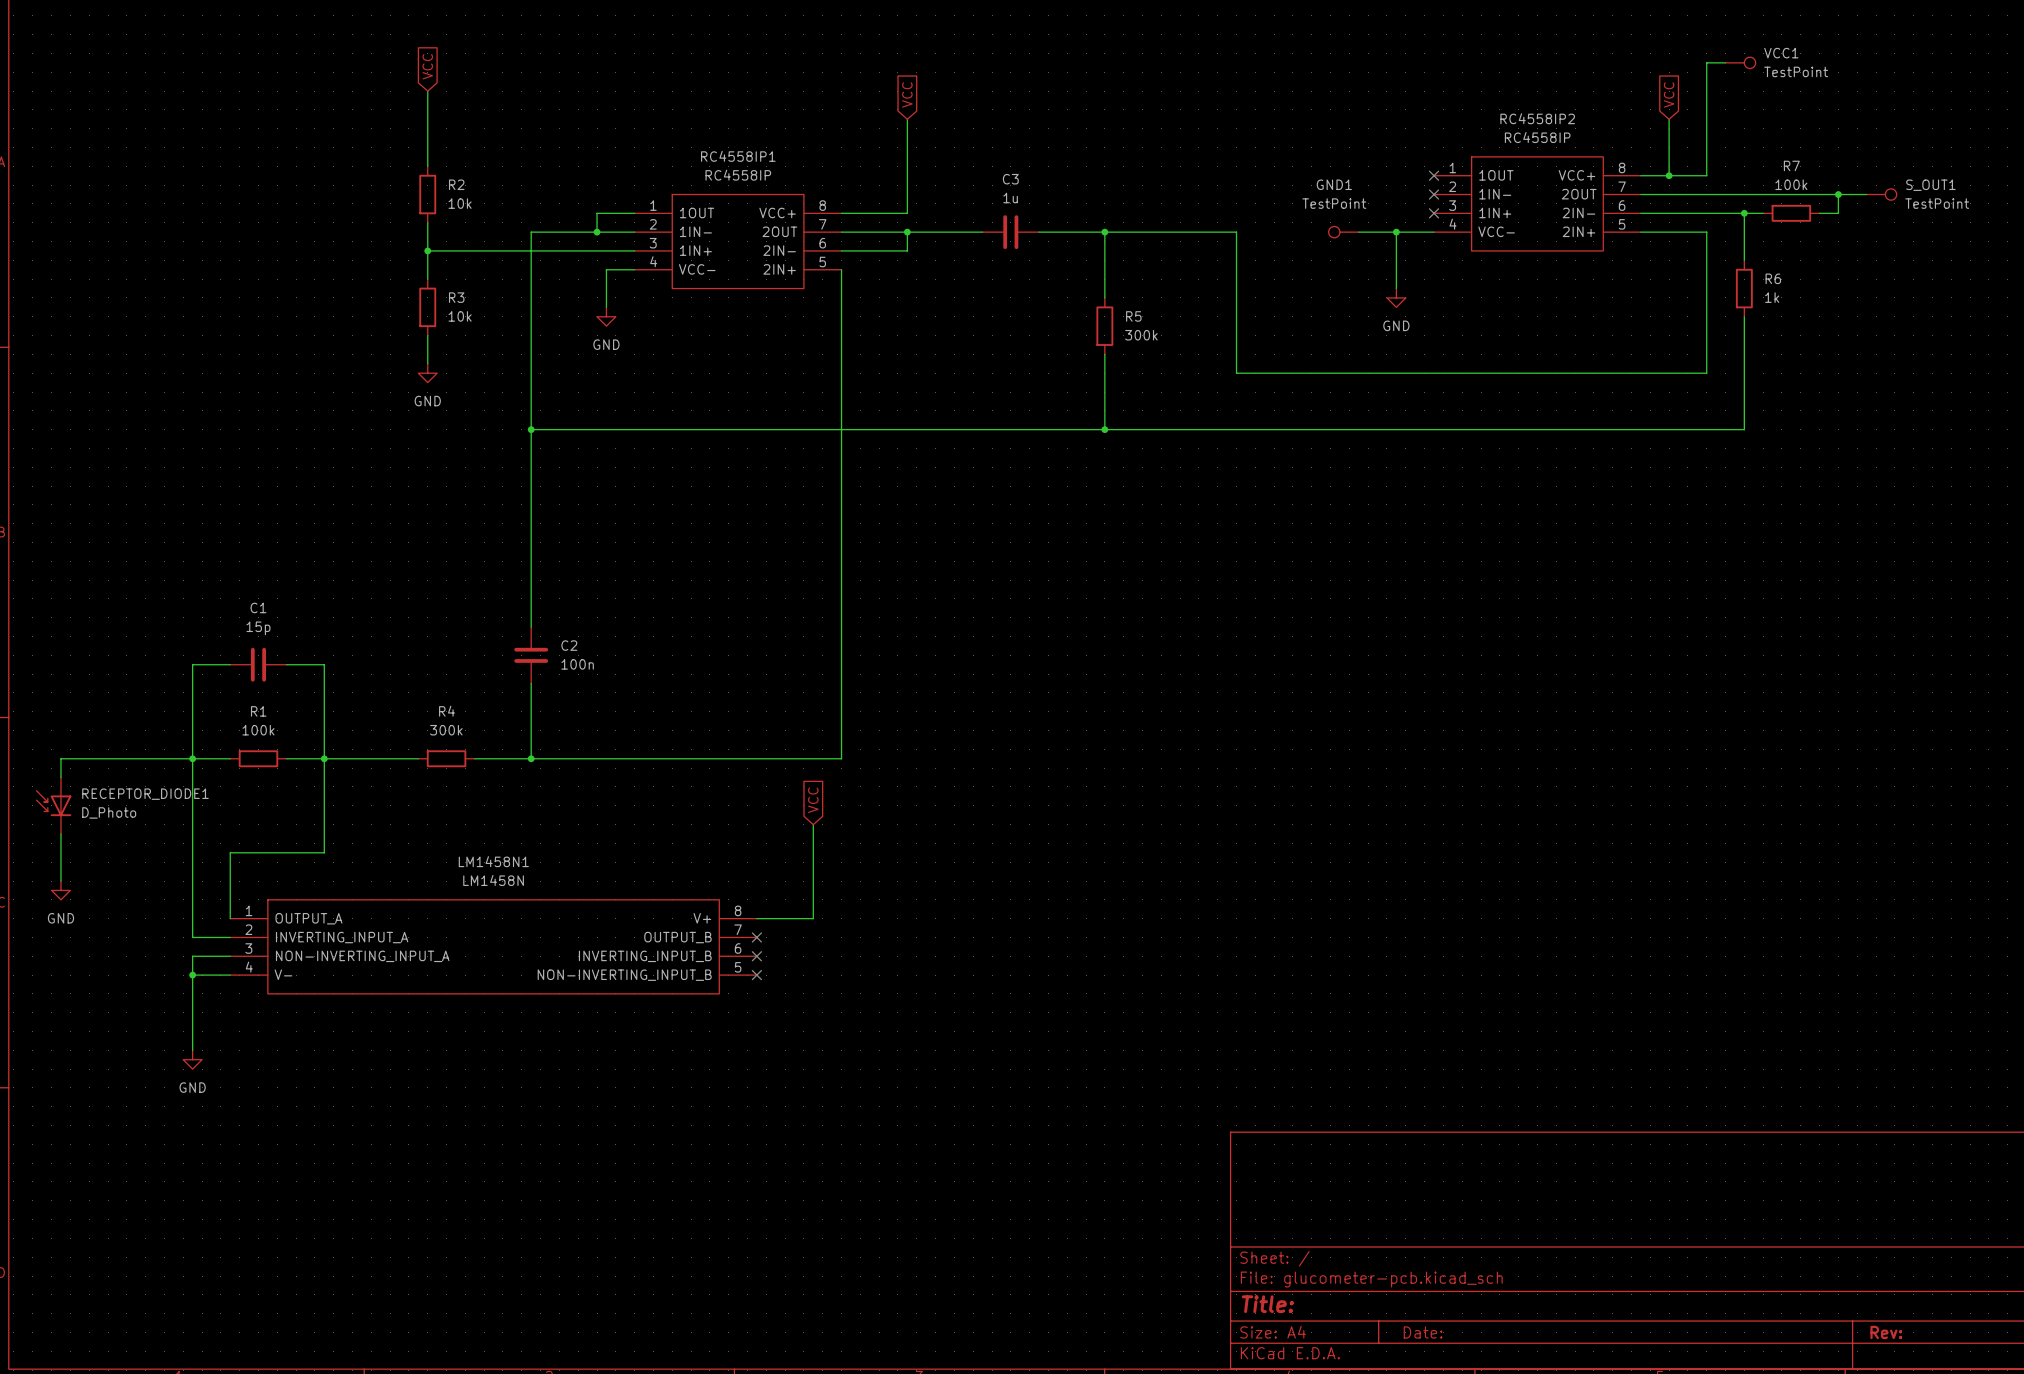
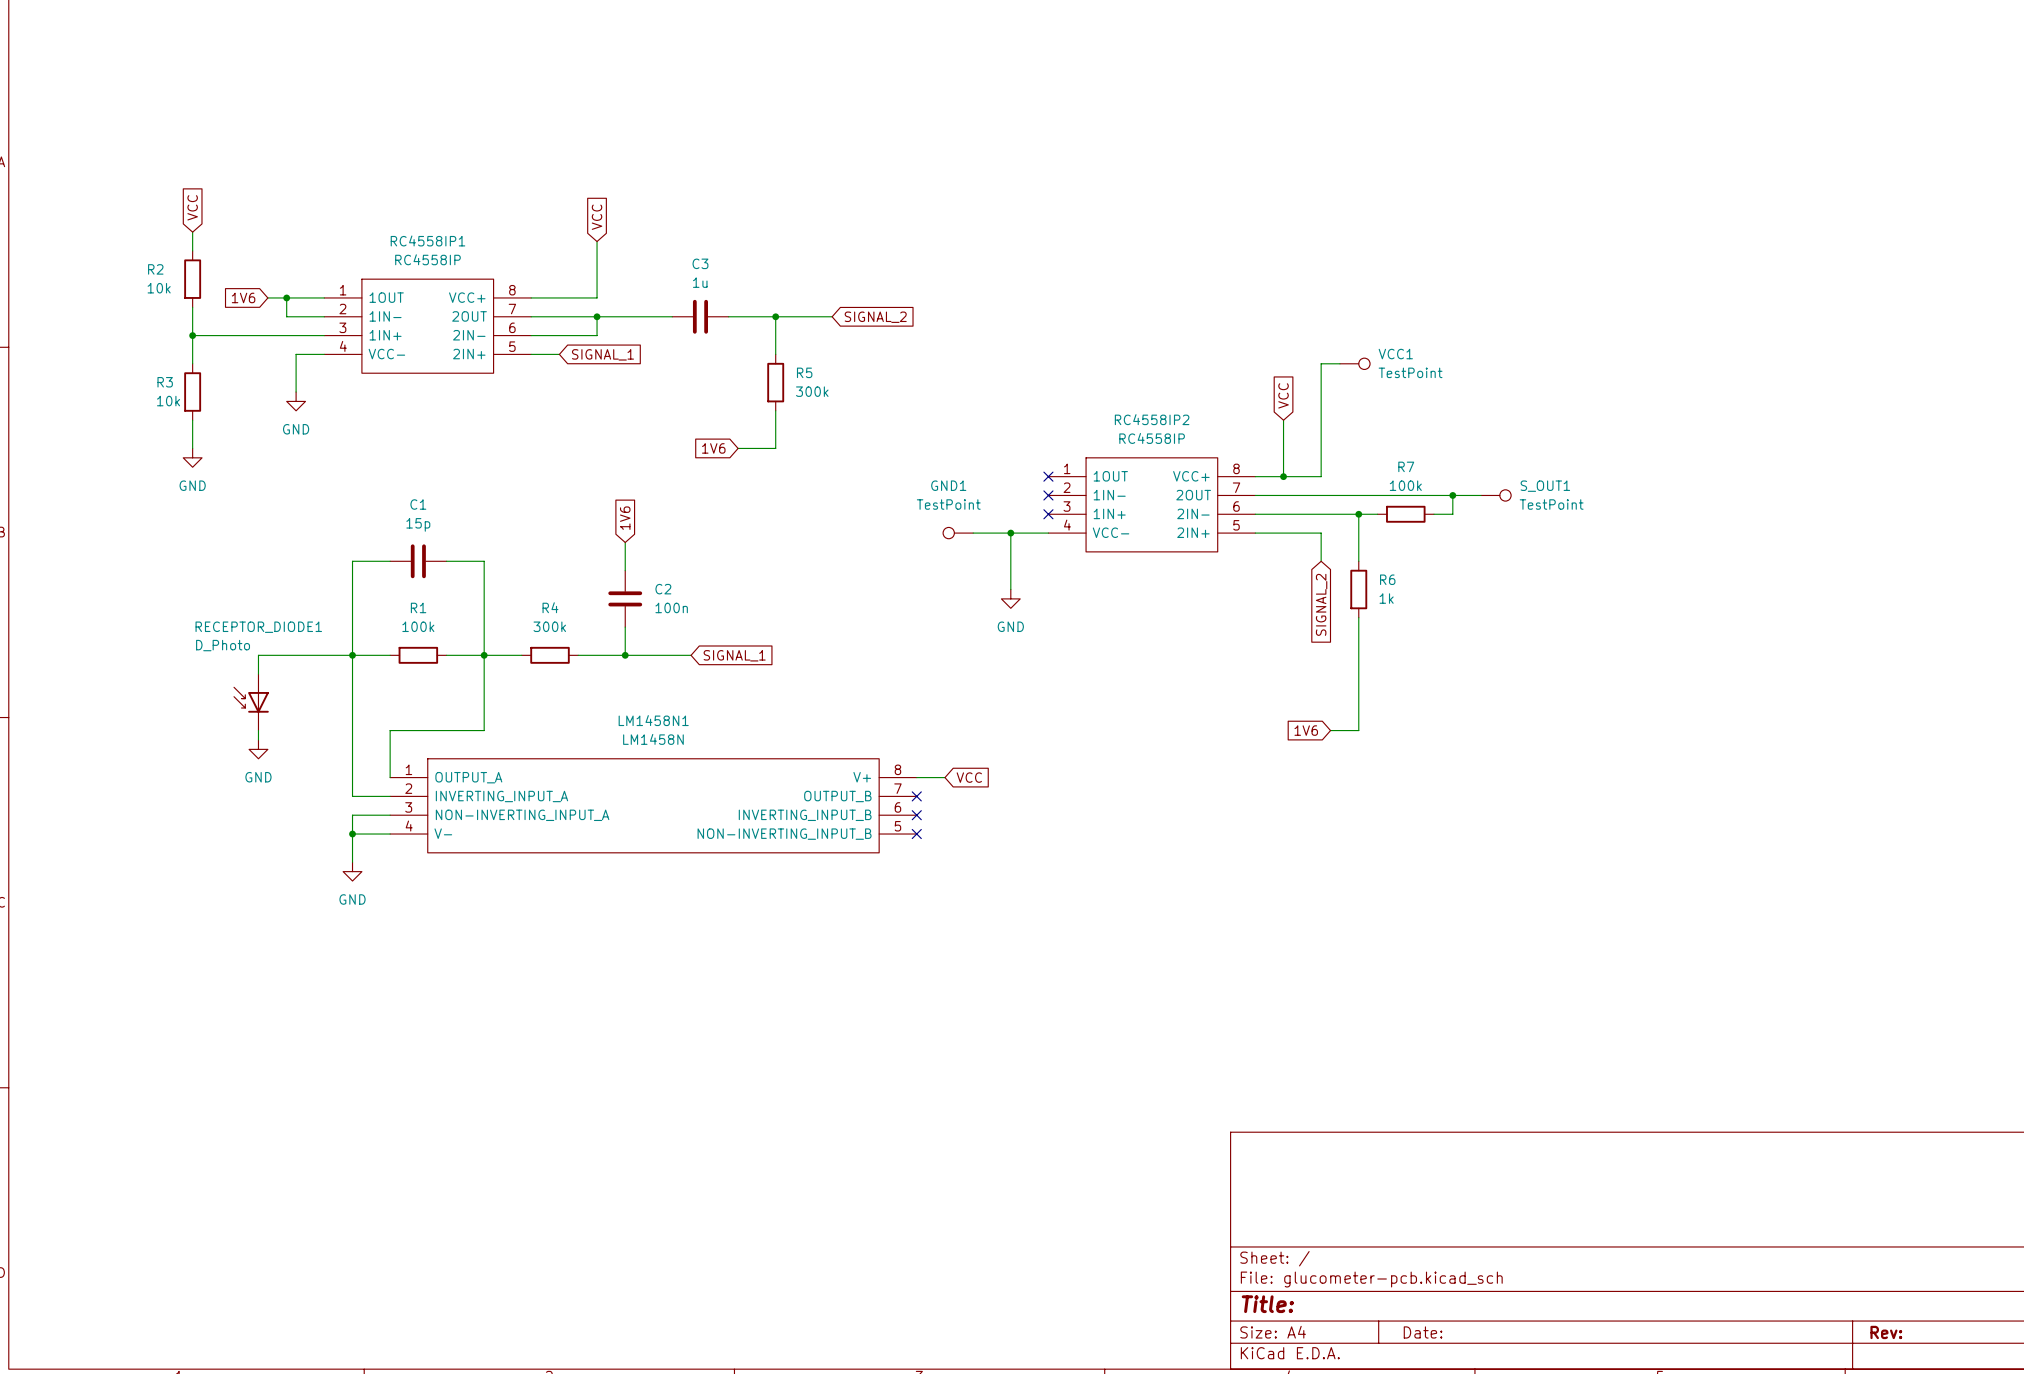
wire: (1725, 62) (1706, 62) (1706, 175) (1640, 175) -> none
VCC1 position: (1740, 62) -> (1355, 363)
global label: VCC (427, 66) -> none
wire: (427, 91) (427, 166) -> none
global label: VCC (907, 94) -> none
global label: VCC (1669, 94) -> none
wire: (907, 119) (907, 213) (841, 213) -> none
wire: (1669, 119) (1669, 175) -> none
no-connect mark: (1434, 175) -> none
junction: (1669, 175) -> none
R2 name position: R2 (456, 184) -> R2 (155, 269)
R2 position: (427, 194) -> (192, 279)
no-connect mark: (1434, 194) -> none
wire: (1640, 194) (1866, 194) -> none
wire: (1838, 194) (1838, 213) (1819, 213) -> none
junction: (1838, 194) -> none
S_OUT1 position: (1881, 194) -> (1496, 495)
R2 value position: 10k (460, 203) -> 10k (159, 288)
RC4558IP2 position: (1537, 203) -> (1151, 504)
global label: none -> VCC (192, 207)
wire: (634, 213) (597, 213) (597, 232) -> none
no-connect mark: (1434, 213) -> none
wire: (1640, 213) (1763, 213) -> none
wire: (1744, 213) (1744, 260) -> none
junction: (1744, 213) -> none
R7 position: (1791, 213) -> (1405, 514)
global label: none -> VCC (597, 217)
wire: (427, 222) (427, 279) -> none
wire: none -> (192, 232) (192, 250)
junction: (597, 232) -> none
wire: (634, 232) (531, 232) (531, 627) -> none
wire: (841, 232) (982, 232) -> none
wire: (907, 232) (907, 250) (841, 250) -> none
junction: (907, 232) -> none
C3 position: (1010, 232) -> (700, 316)
wire: (1039, 232) (1236, 232) (1236, 373) (1706, 373) (1706, 232) (1640, 232) -> none
wire: (1104, 232) (1104, 297) -> none
junction: (1104, 232) -> none
GND1 position: (1343, 232) -> (958, 533)
wire: (1358, 232) (1434, 232) -> none
wire: (1396, 232) (1396, 288) -> none
junction: (1396, 232) -> none
wire: none -> (597, 241) (597, 297) (531, 297)
RC4558IP1 position: (738, 241) -> (427, 326)
wire: (427, 250) (634, 250) -> none
junction: (427, 250) -> none
wire: (634, 269) (606, 269) (606, 307) -> none
wire: (841, 269) (841, 758) (474, 758) -> none
R6 position: (1744, 288) -> (1358, 589)
global label: none -> 1V6 (243, 297)
wire: none -> (267, 297) (324, 297)
wire: none -> (286, 297) (286, 316) (324, 316)
junction: none -> (286, 297)
R3 name position: R3 (456, 297) -> R3 (165, 382)
power symbol: GND (1396, 297) -> none
wire: none -> (192, 307) (192, 363)
R3 position: (427, 307) -> (192, 392)
R3 value position: 10k (460, 316) -> 10k (168, 401)
wire: none -> (531, 316) (672, 316)
wire: none -> (597, 316) (597, 335) (531, 335)
junction: none -> (597, 316)
power symbol: GND (606, 316) -> none
wire: none -> (728, 316) (832, 316)
wire: none -> (775, 316) (775, 354)
junction: none -> (775, 316)
wire: (1744, 316) (1744, 429) (531, 429) -> none
global label: none -> SIGNAL_2 (875, 317)
R5 position: (1104, 326) -> (775, 382)
wire: none -> (192, 335) (324, 335)
junction: none -> (192, 335)
wire: (427, 335) (427, 363) -> none
wire: none -> (324, 354) (296, 354) (296, 392)
wire: none -> (531, 354) (559, 354)
global label: none -> SIGNAL_1 (602, 354)
wire: (1104, 354) (1104, 429) -> none
wire: none -> (1339, 363) (1321, 363) (1321, 476) (1255, 476)
power symbol: GND (427, 373) -> none
global label: none -> VCC (1283, 395)
power symbol: none -> GND (296, 401)
wire: none -> (775, 410) (775, 448) (738, 448)
wire: none -> (192, 420) (192, 448)
wire: none -> (1283, 420) (1283, 476)
junction: (531, 429) -> none
junction: (1104, 429) -> none
global label: none -> 1V6 (713, 448)
power symbol: none -> GND (192, 457)
no-connect mark: none -> (1048, 476)
junction: none -> (1283, 476)
no-connect mark: none -> (1048, 495)
wire: none -> (1255, 495) (1481, 495)
wire: none -> (1452, 495) (1452, 514) (1434, 514)
junction: none -> (1452, 495)
no-connect mark: none -> (1048, 514)
wire: none -> (1255, 514) (1377, 514)
wire: none -> (1358, 514) (1358, 561)
junction: none -> (1358, 514)
global label: none -> 1V6 (625, 518)
wire: none -> (973, 533) (1048, 533)
wire: none -> (1010, 533) (1010, 589)
junction: none -> (1010, 533)
wire: none -> (1255, 533) (1321, 533) (1321, 561)
wire: none -> (625, 542) (625, 570)
wire: none -> (390, 561) (352, 561) (352, 796) (390, 796)
wire: none -> (446, 561) (484, 561) (484, 730) (390, 730) (390, 777)
power symbol: none -> GND (1010, 598)
global label: none -> SIGNAL_2 (1321, 604)
wire: none -> (1358, 617) (1358, 730) (1330, 730)
wire: none -> (625, 627) (625, 655)
junction: none -> (352, 655)
wire: none -> (390, 655) (258, 655) (258, 674)
wire: none -> (446, 655) (521, 655)
junction: none -> (484, 655)
C2 position: (531, 655) -> (625, 598)
wire: none -> (578, 655) (691, 655)
junction: none -> (625, 655)
global label: none -> SIGNAL_1 (734, 655)
wire: (230, 664) (192, 664) (192, 937) (230, 937) -> none
C1 position: (258, 664) -> (418, 561)
wire: (286, 664) (324, 664) (324, 852) (230, 852) (230, 918) -> none
wire: (531, 683) (531, 758) -> none
wire: none -> (258, 730) (258, 739)
global label: none -> 1V6 (1306, 730)
power symbol: none -> GND (258, 749)
junction: (192, 758) -> none
wire: (230, 758) (60, 758) (60, 777) -> none
R1 position: (258, 758) -> (418, 655)
wire: (286, 758) (418, 758) -> none
junction: (324, 758) -> none
R4 position: (446, 758) -> (550, 655)
junction: (531, 758) -> none
wire: none -> (916, 777) (944, 777)
RECEPTOR_DIODE1 name position: RECEPTOR_DIODE1 (145, 794) -> RECEPTOR_DIODE1 (258, 627)
no-connect mark: none -> (916, 796)
global label rotation: 0° (813, 800) -> 90° clockwise (969, 777)
global label position: VCC (813, 800) -> VCC (969, 777)
RECEPTOR_DIODE1 position: (53, 805) -> (251, 702)
RECEPTOR_DIODE1 value position: D_Photo (109, 812) -> D_Photo (223, 645)
wire: none -> (390, 815) (352, 815) (352, 862)
no-connect mark: none -> (916, 815)
wire: (813, 824) (813, 918) (756, 918) -> none
wire: (60, 834) (60, 881) -> none
wire: none -> (352, 834) (390, 834)
junction: none -> (352, 834)
no-connect mark: none -> (916, 834)
power symbol: none -> GND (352, 871)
power symbol: GND (60, 890) -> none
no-connect mark: (756, 937) -> none
LM1458N1 position: (493, 946) -> (653, 805)
wire: (230, 956) (192, 956) (192, 1050) -> none
no-connect mark: (756, 956) -> none
wire: (192, 975) (230, 975) -> none
junction: (192, 975) -> none
no-connect mark: (756, 975) -> none
power symbol: GND (192, 1059) -> none

